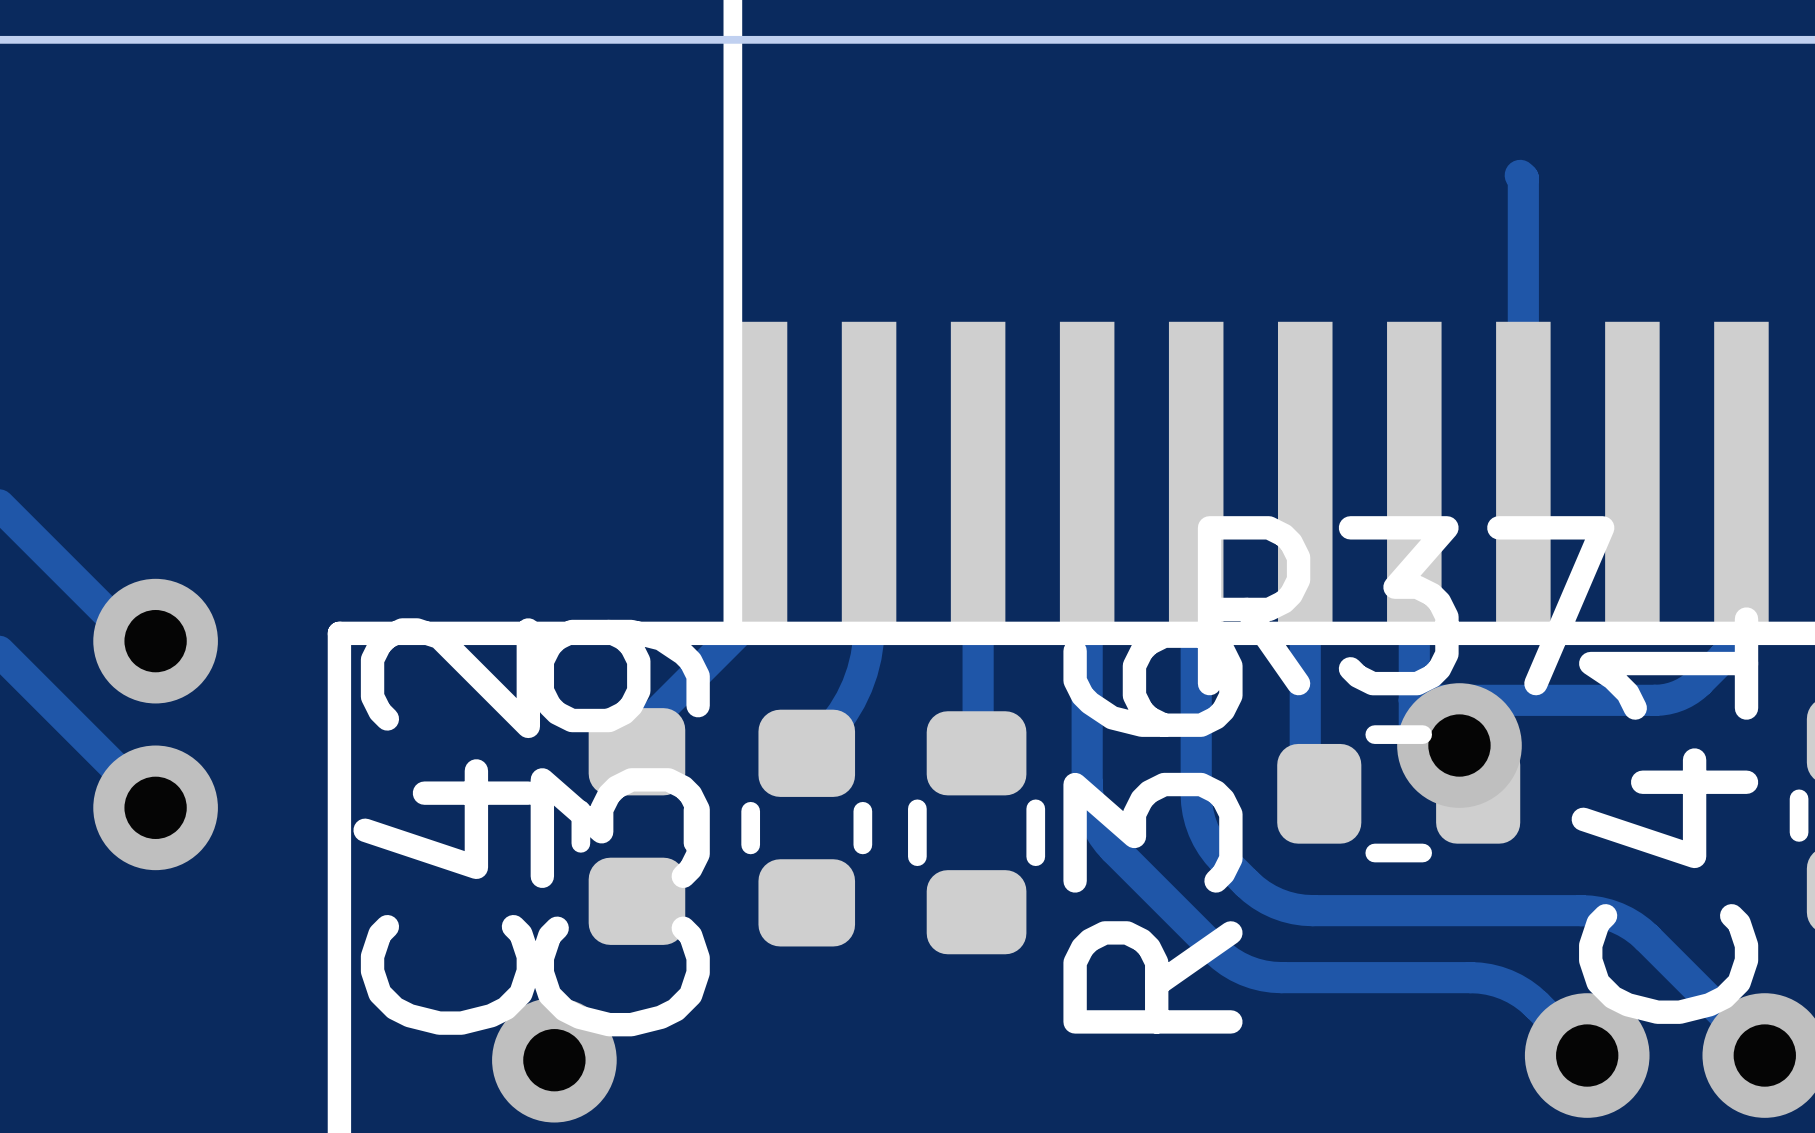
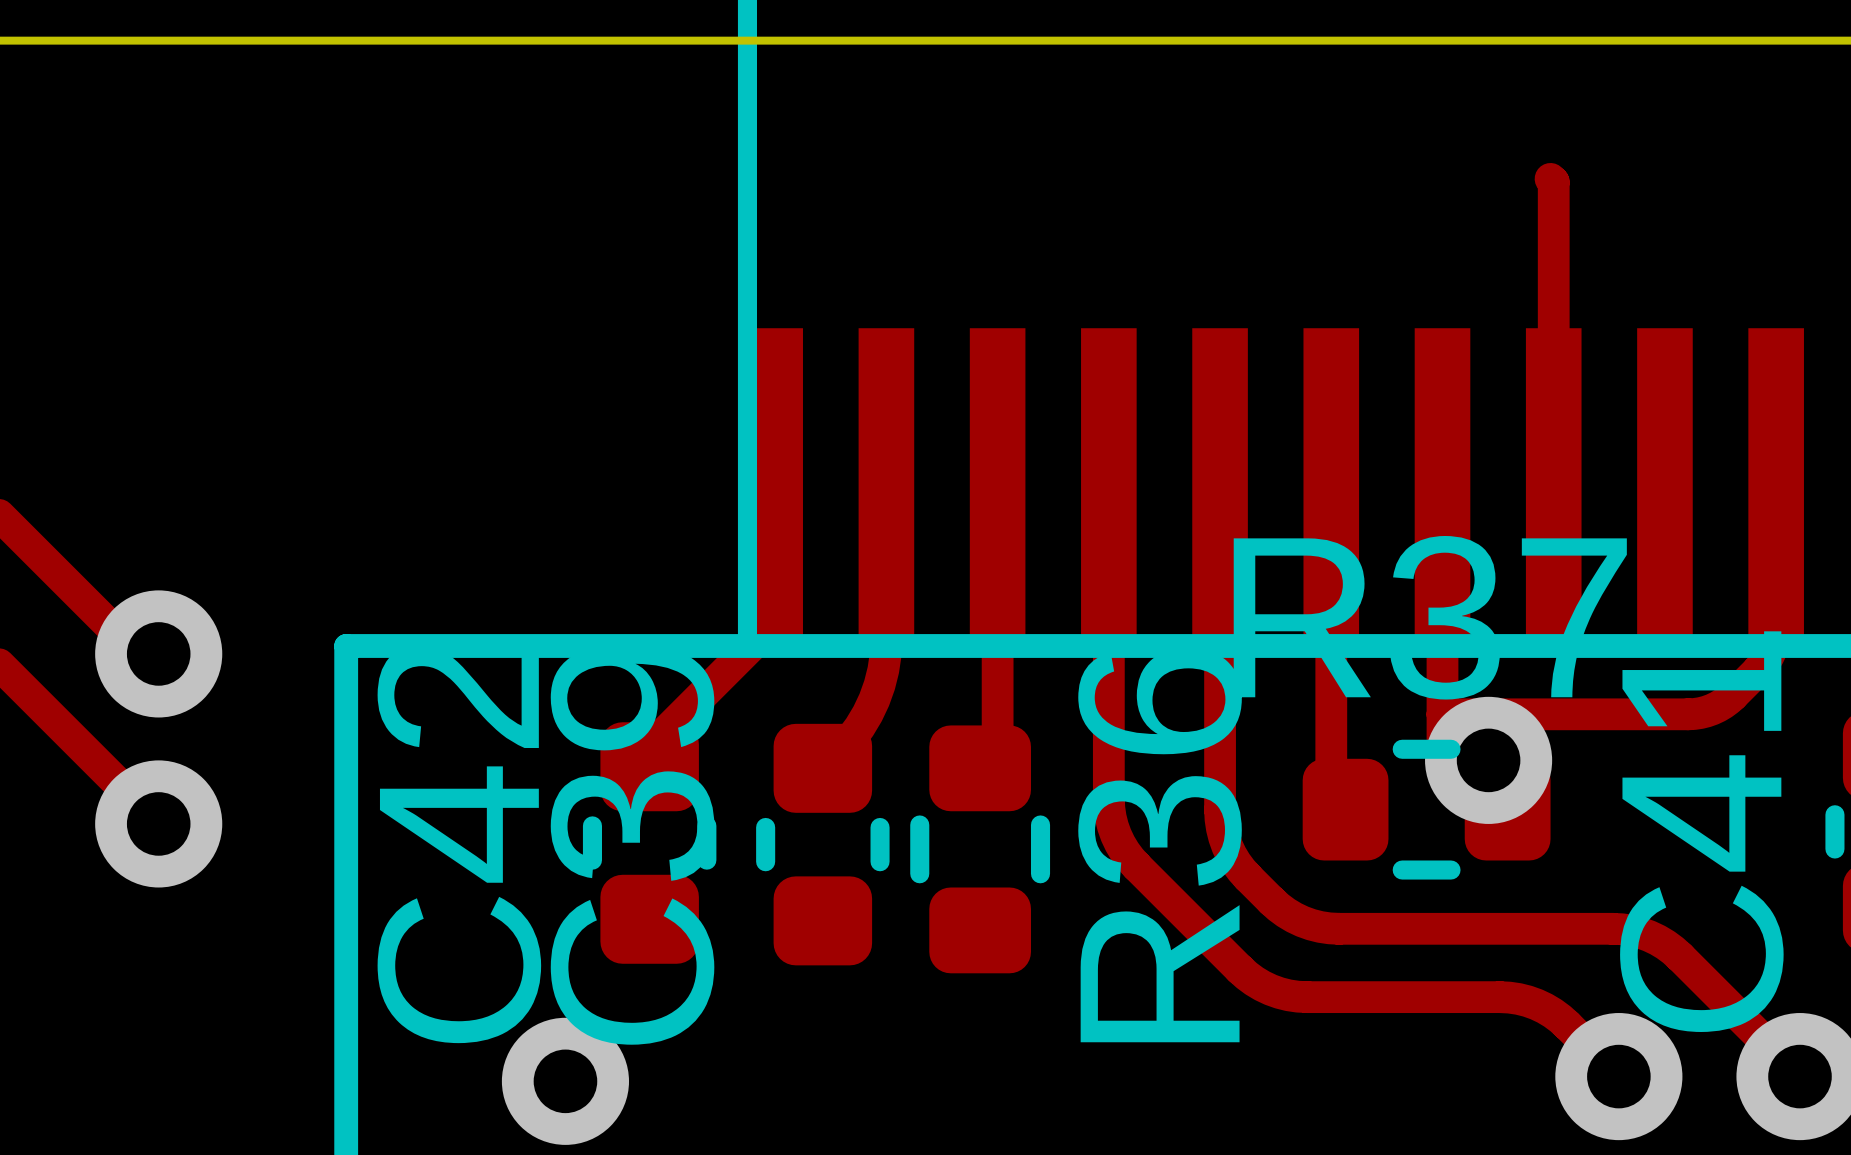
R36 position: (976, 832) -> (980, 849)

